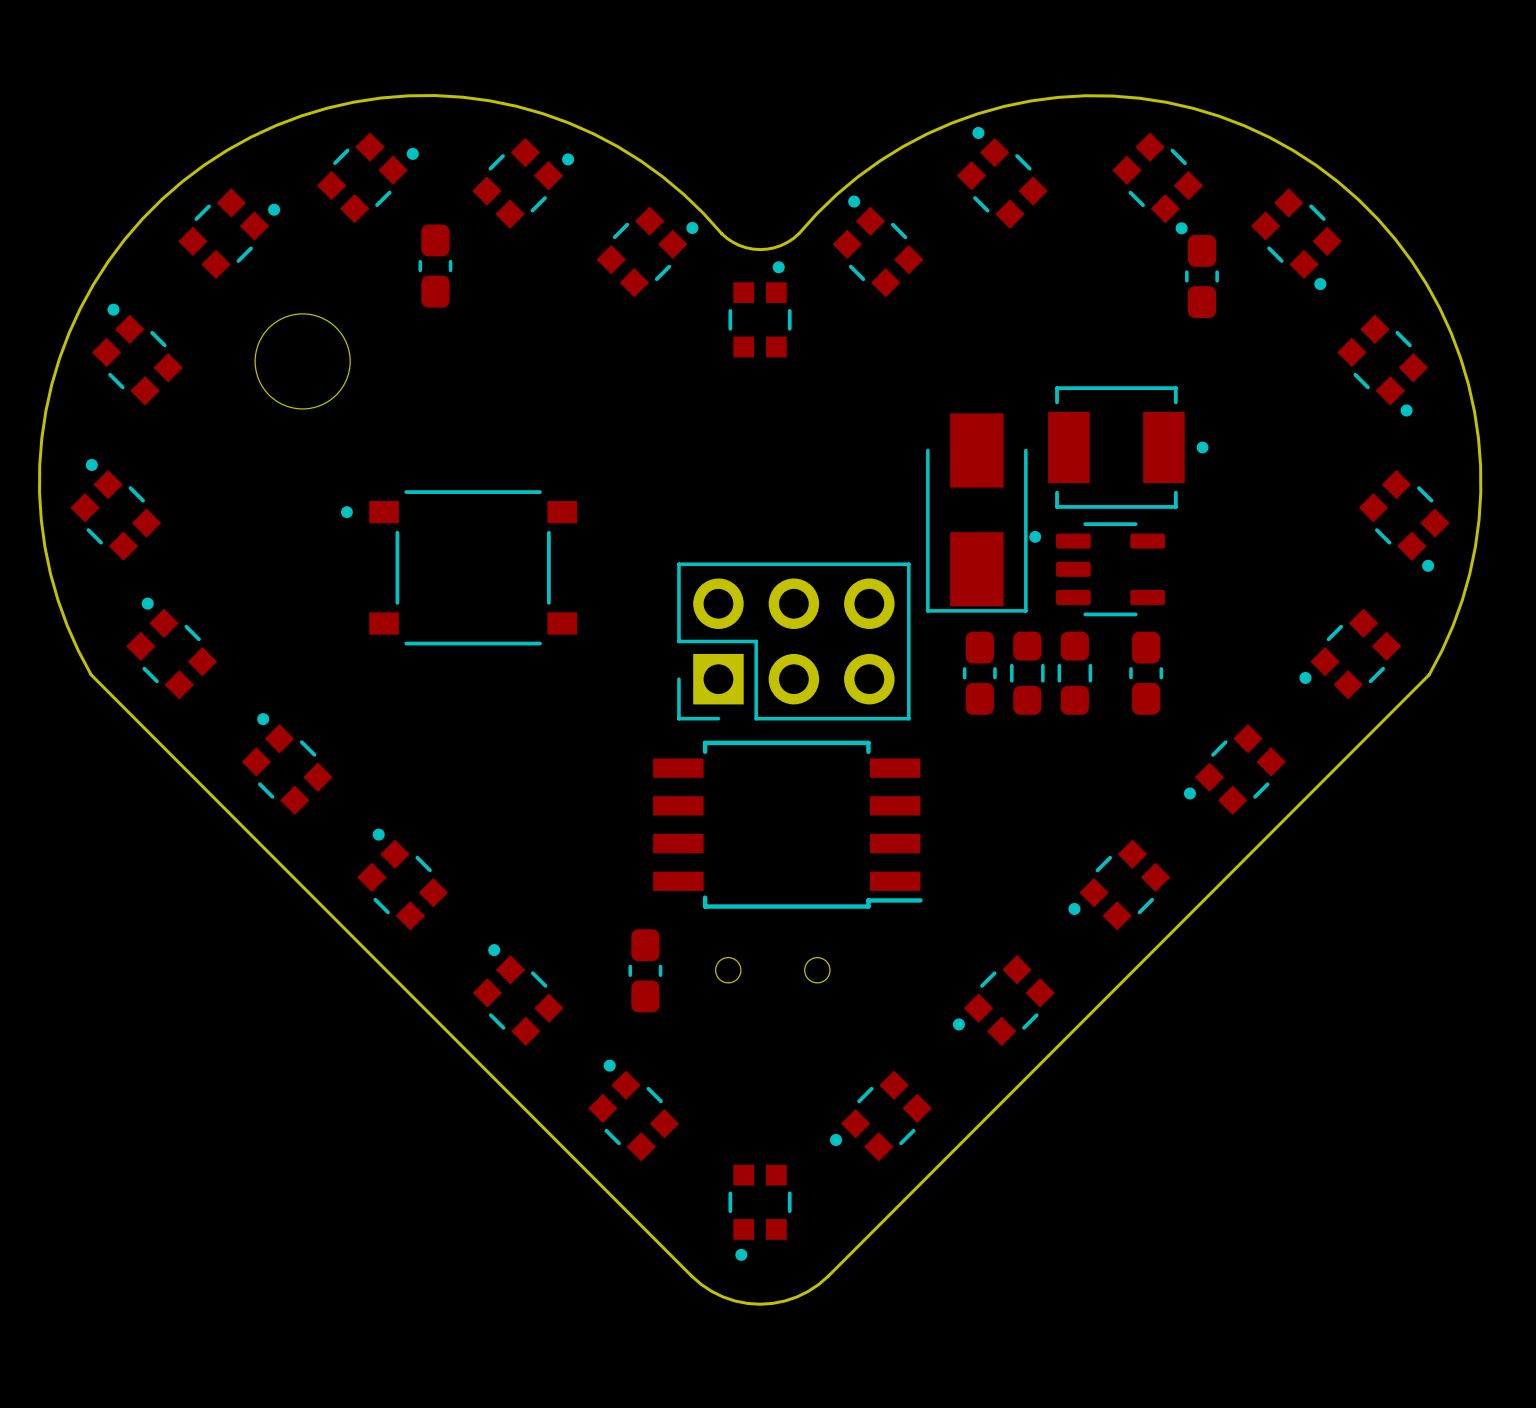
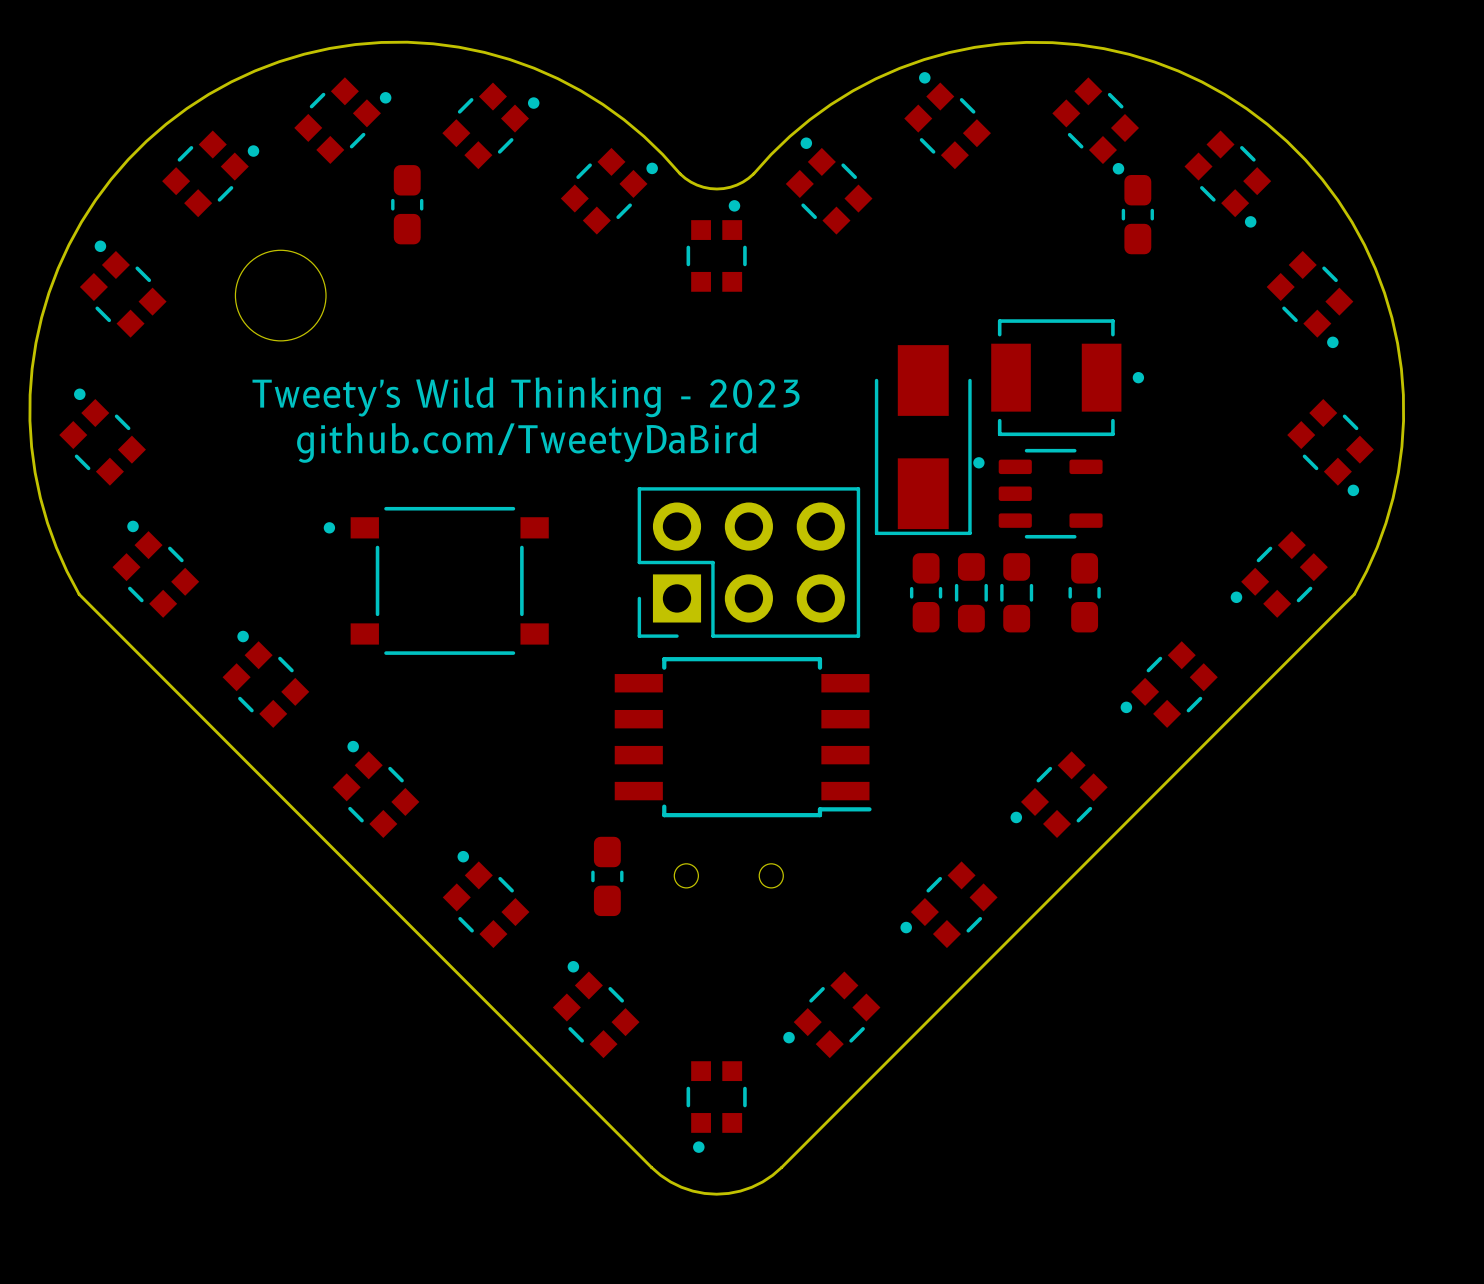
text: none -> Tweety's Wild Thinking - 2023 (526, 397)
text: none -> github.com/TweetyDaBird (526, 442)
part position: (459, 567) -> (436, 580)

